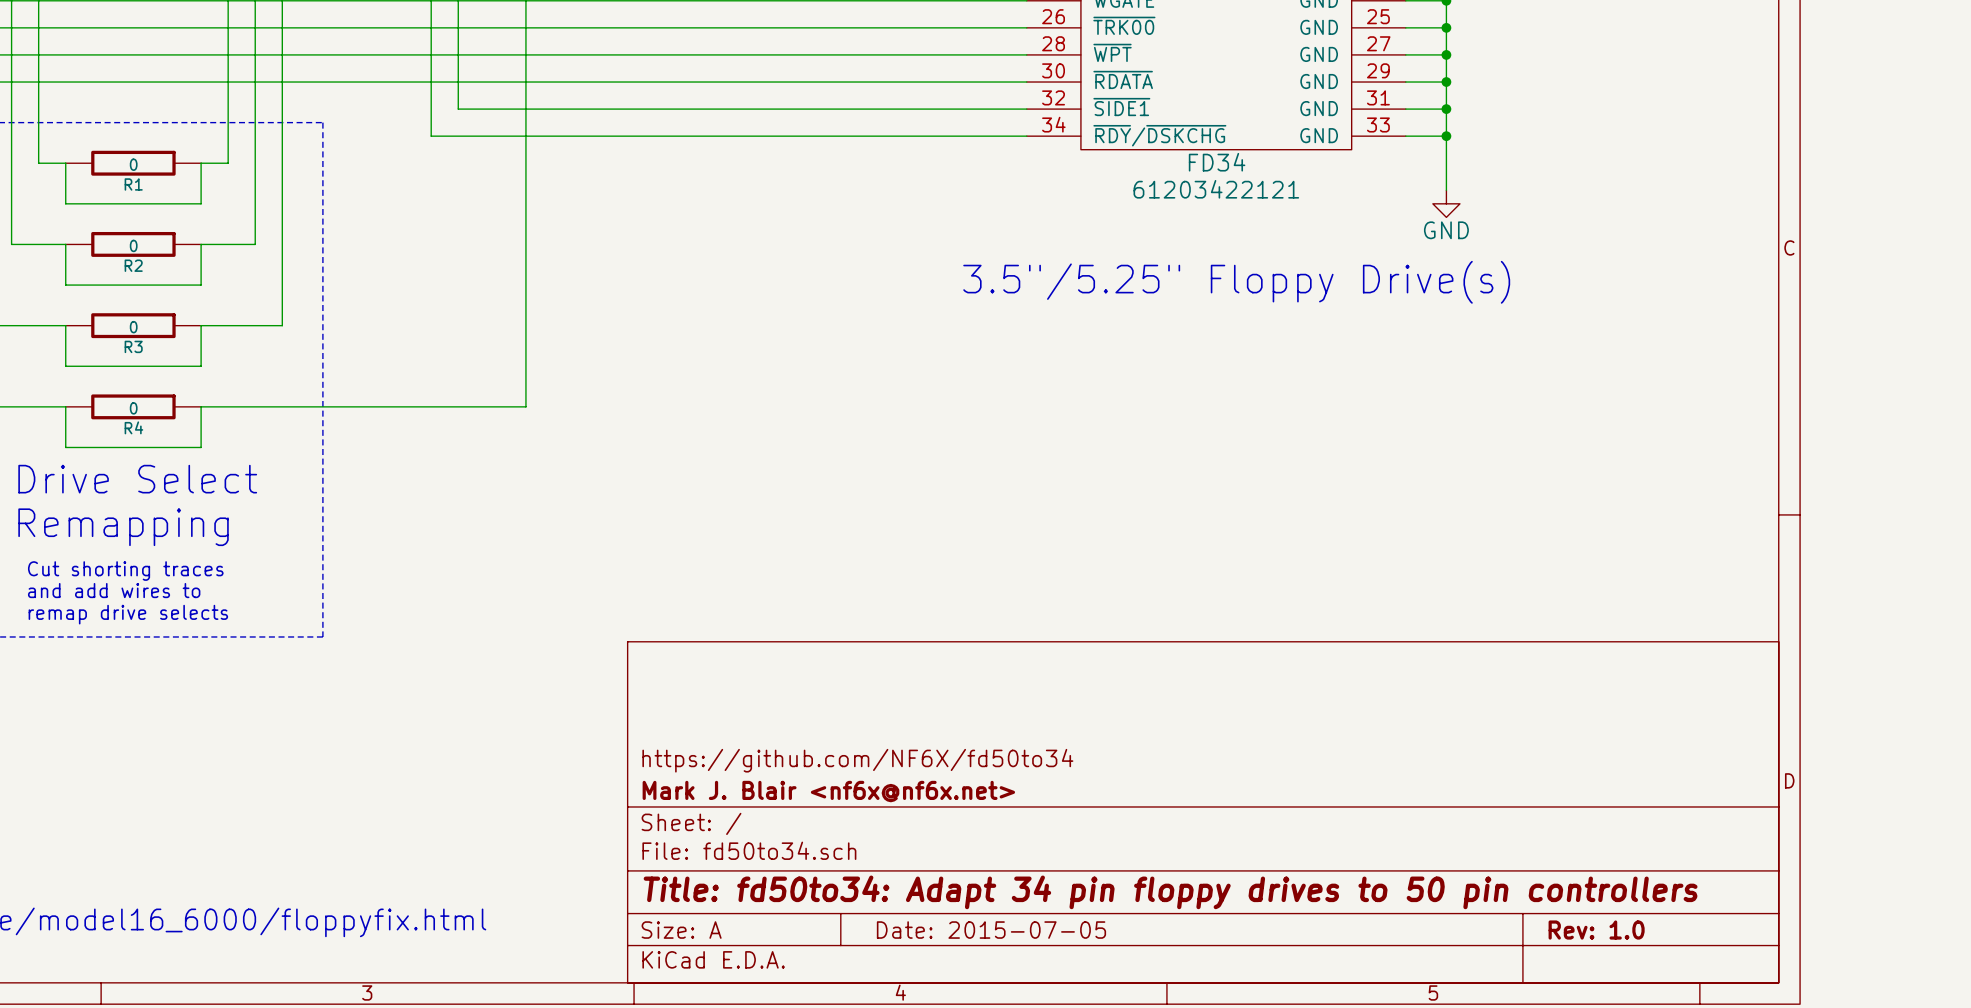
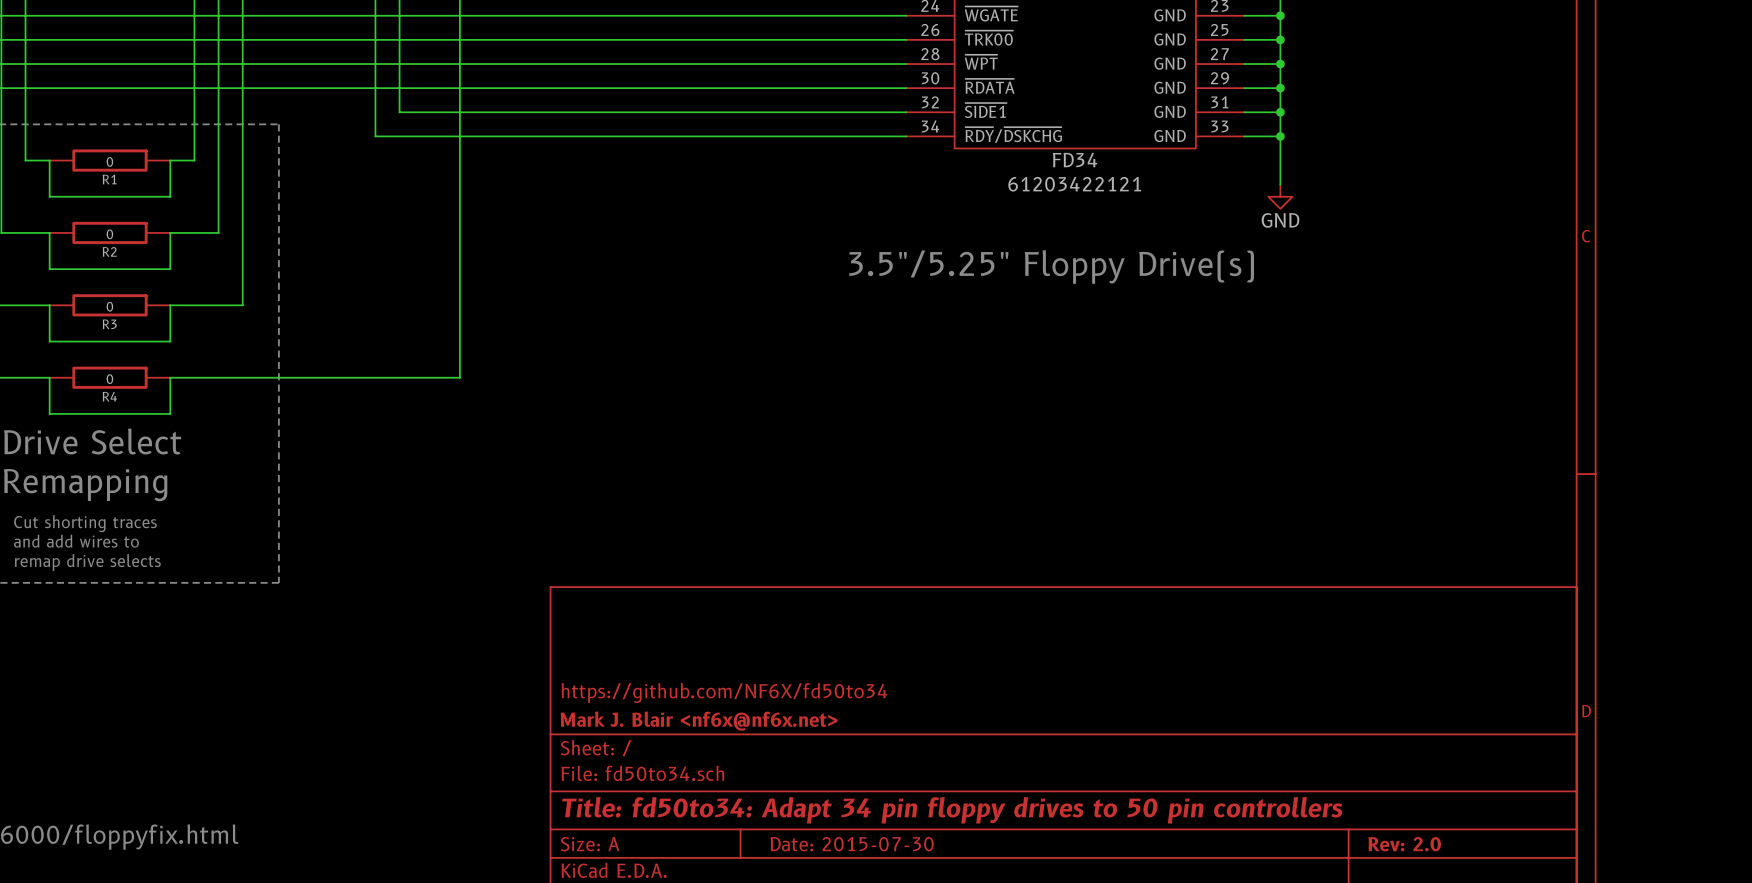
title block: Date: 2015-07-05 (991, 930) -> Date: 2015-07-30 (852, 844)
title block: Rev: 1.0 (1596, 930) -> Rev: 2.0 (1404, 844)

